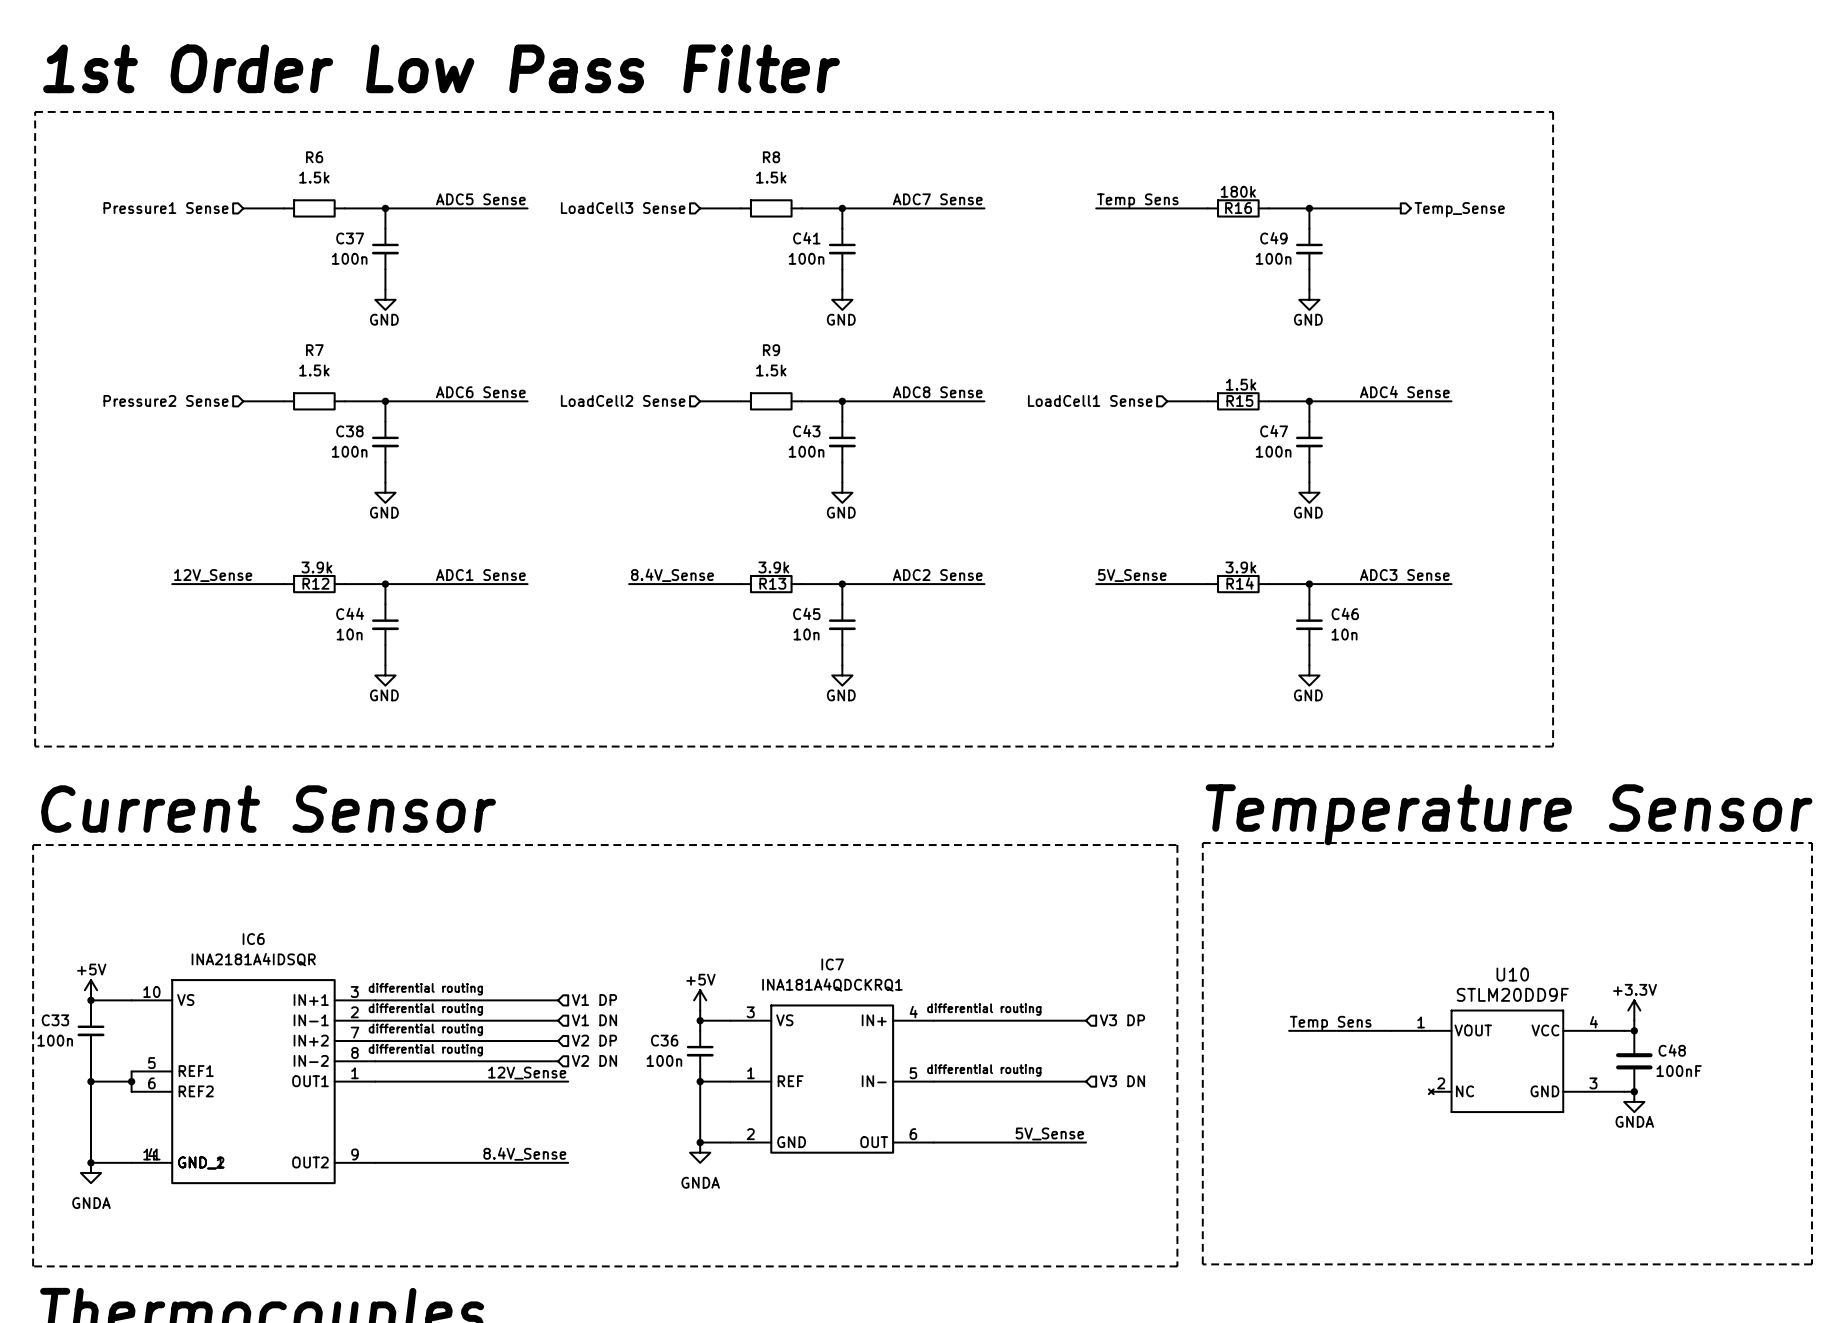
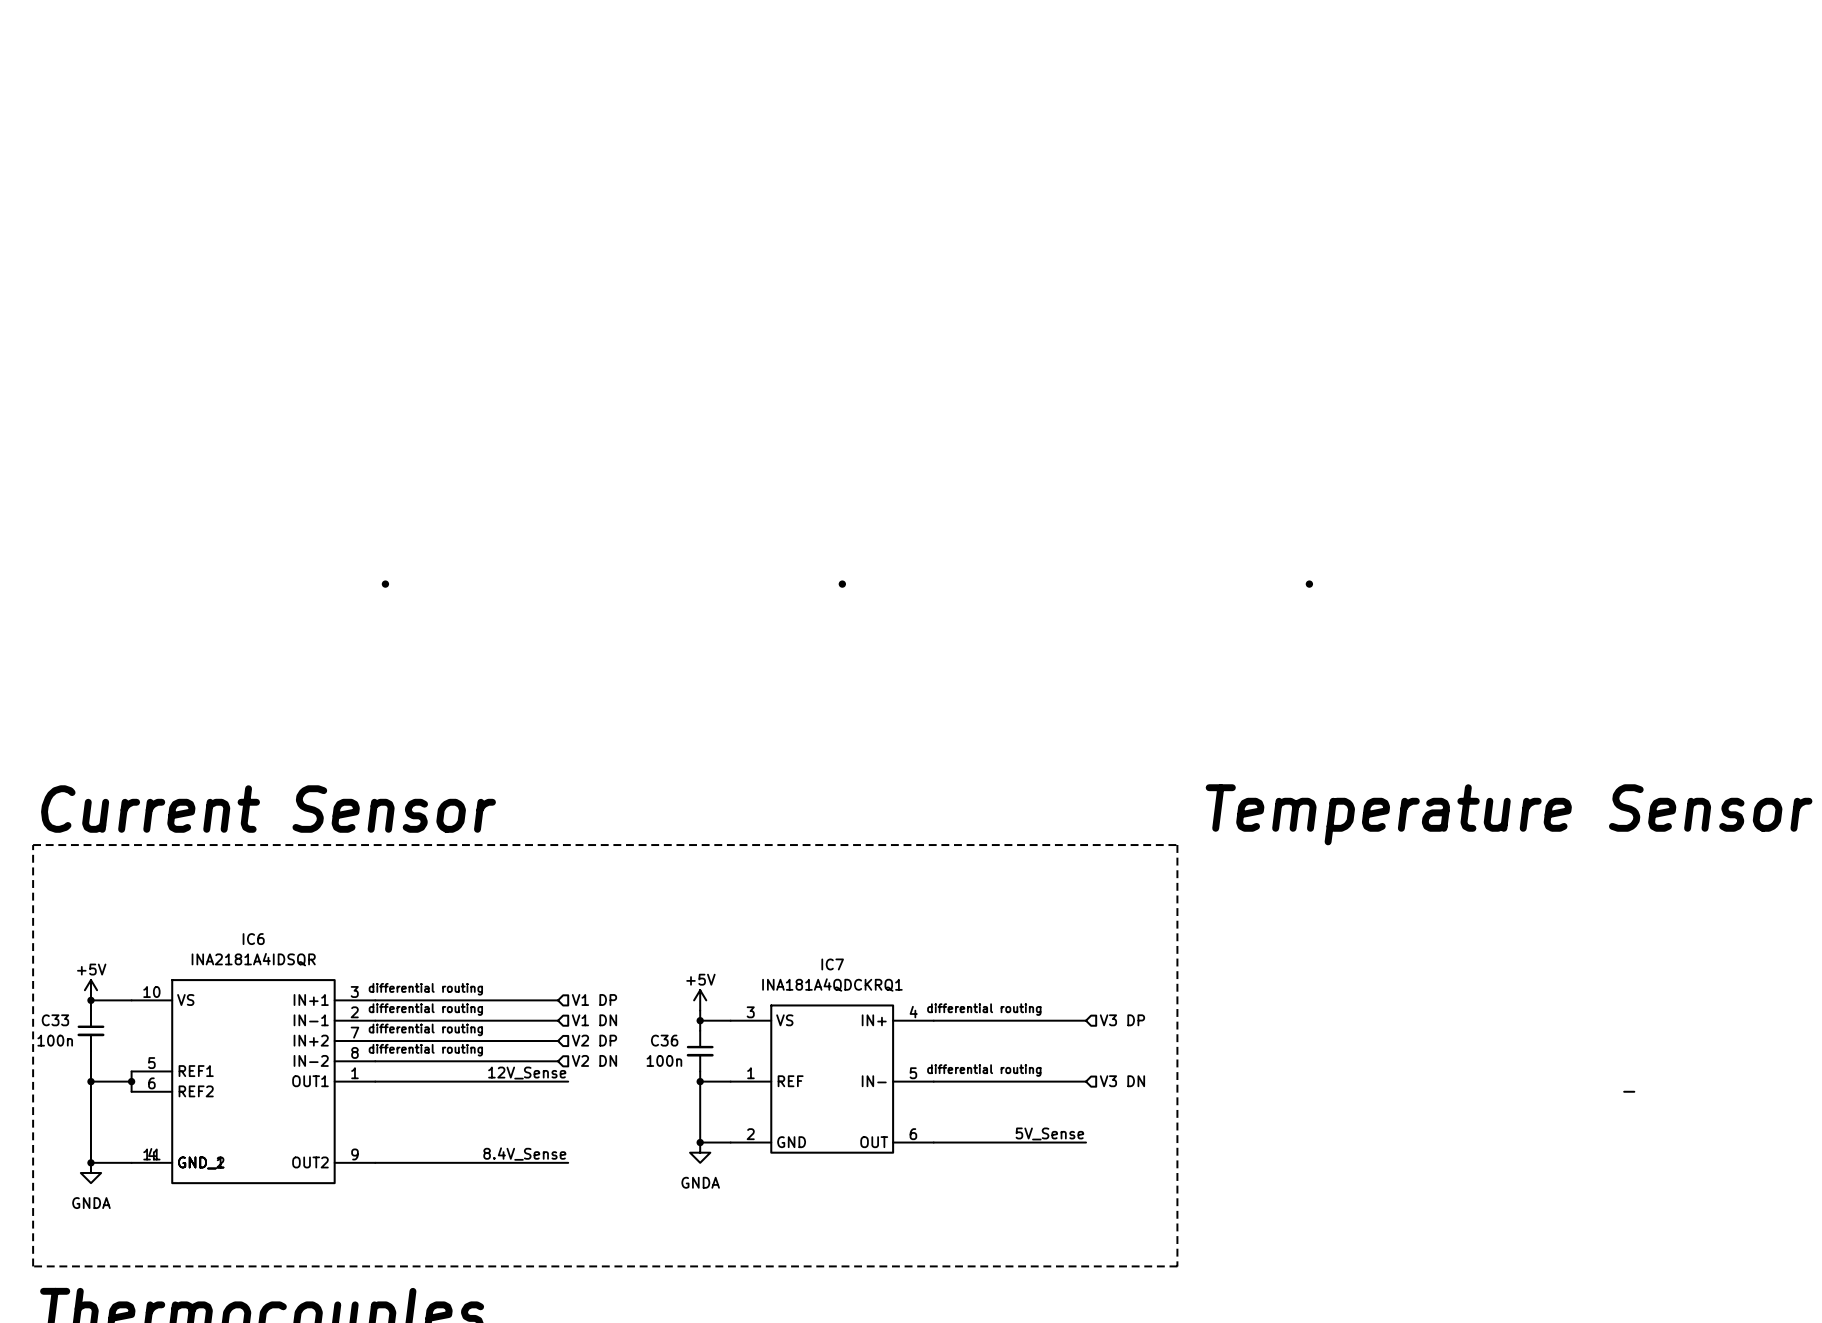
text: 1st Order Low Pass Filter (441, 68) -> none
line: (35, 111) (1553, 111) (1553, 746) (35, 746) (35, 111) -> none
label: ADC5 Sense (480, 199) -> none
label: ADC7 Sense (937, 199) -> none
label: Temp Sens (1137, 201) -> none
hierarchical label: Pressure1 Sense (166, 208) -> none
wire: (243, 208) (283, 208) -> none
R6: 1.5k (314, 208) -> none
wire: (344, 208) (527, 208) -> none
wire: (385, 208) (385, 228) -> none
junction: (385, 208) -> none
hierarchical label: LoadCell3 Sense (623, 208) -> none
wire: (700, 208) (740, 208) -> none
R8: 1.5k (771, 208) -> none
wire: (801, 208) (984, 208) -> none
wire: (842, 208) (842, 228) -> none
junction: (842, 208) -> none
wire: (1096, 208) (1207, 208) -> none
R16: 180k (1238, 208) -> none
wire: (1268, 208) (1400, 208) -> none
wire: (1309, 208) (1309, 228) -> none
junction: (1309, 208) -> none
hierarchical label: Temp_Sense (1459, 209) -> none
C37: 100n (385, 249) -> none
C41: 100n (842, 249) -> none
C49: 100n (1309, 249) -> none
wire: (385, 269) (385, 289) -> none
wire: (842, 269) (842, 289) -> none
wire: (1309, 269) (1309, 289) -> none
power symbol: GND (385, 299) -> none
power symbol: GND (842, 299) -> none
power symbol: GND (1309, 299) -> none
label: ADC6 Sense (480, 392) -> none
label: ADC8 Sense (937, 392) -> none
label: ADC4 Sense (1404, 392) -> none
hierarchical label: Pressure2 Sense (166, 400) -> none
hierarchical label: LoadCell2 Sense (623, 400) -> none
hierarchical label: LoadCell1 Sense (1090, 400) -> none
wire: (243, 401) (283, 401) -> none
R7: 1.5k (314, 401) -> none
wire: (344, 401) (527, 401) -> none
wire: (385, 401) (385, 421) -> none
junction: (385, 401) -> none
wire: (700, 401) (740, 401) -> none
R9: 1.5k (771, 401) -> none
wire: (801, 401) (984, 401) -> none
wire: (842, 401) (842, 421) -> none
junction: (842, 401) -> none
wire: (1167, 401) (1207, 401) -> none
R15: 1.5k (1238, 401) -> none
wire: (1268, 401) (1451, 401) -> none
wire: (1309, 401) (1309, 421) -> none
junction: (1309, 401) -> none
C38: 100n (385, 441) -> none
C43: 100n (842, 441) -> none
C47: 100n (1309, 441) -> none
wire: (385, 462) (385, 482) -> none
wire: (842, 462) (842, 482) -> none
wire: (1309, 462) (1309, 482) -> none
power symbol: GND (385, 492) -> none
power symbol: GND (842, 492) -> none
power symbol: GND (1309, 492) -> none
label: 12V_Sense (213, 575) -> none
label: ADC1 Sense (480, 575) -> none
label: 8.4V_Sense (672, 575) -> none
label: ADC2 Sense (937, 575) -> none
label: 5V_Sense (1132, 575) -> none
label: ADC3 Sense (1404, 575) -> none
wire: (172, 584) (283, 584) -> none
R12: 3.9k (314, 584) -> none
wire: (344, 584) (527, 584) -> none
wire: (385, 584) (385, 604) -> none
wire: (629, 584) (740, 584) -> none
R13: 3.9k (771, 584) -> none
wire: (801, 584) (984, 584) -> none
wire: (842, 584) (842, 604) -> none
wire: (1096, 584) (1207, 584) -> none
R14: 3.9k (1238, 584) -> none
wire: (1268, 584) (1451, 584) -> none
wire: (1309, 584) (1309, 604) -> none
C44: 10n (385, 624) -> none
C45: 10n (842, 624) -> none
C46: 10n (1309, 624) -> none
wire: (385, 645) (385, 665) -> none
wire: (842, 645) (842, 665) -> none
wire: (1309, 645) (1309, 665) -> none
power symbol: GND (385, 675) -> none
power symbol: GND (842, 675) -> none
power symbol: GND (1309, 675) -> none
line: (1202, 843) (1812, 843) (1812, 1264) (1202, 1264) (1202, 843) -> none
power symbol: +3.3V (1634, 1010) -> none
wire: (1634, 1020) (1634, 1030) (1624, 1030) -> none
label: Temp Sens (1330, 1023) -> none
wire: (1289, 1030) (1390, 1030) -> none
junction: (1634, 1030) -> none
U10: STLM20DD9F (1507, 1061) -> none
C48: 100nF (1634, 1061) -> none
junction: (1634, 1091) -> none
power symbol: GNDA (1634, 1101) -> none

